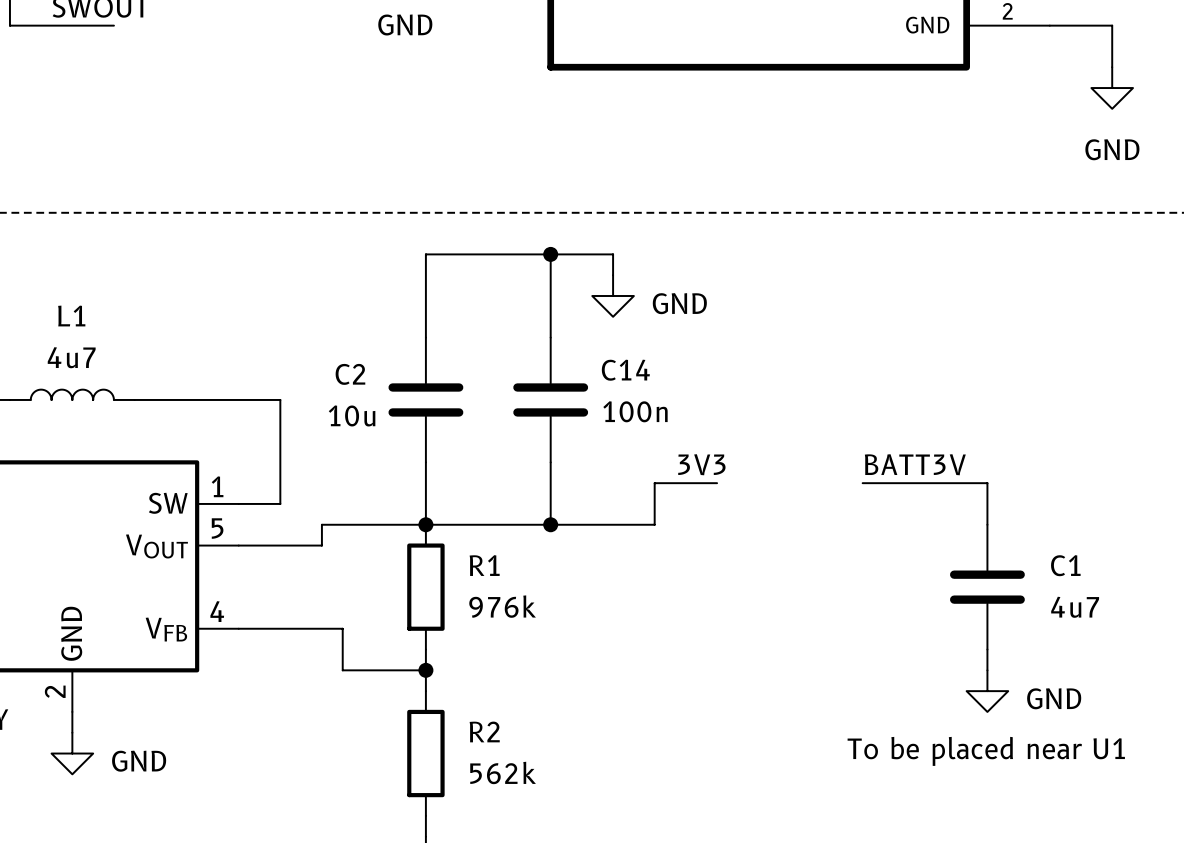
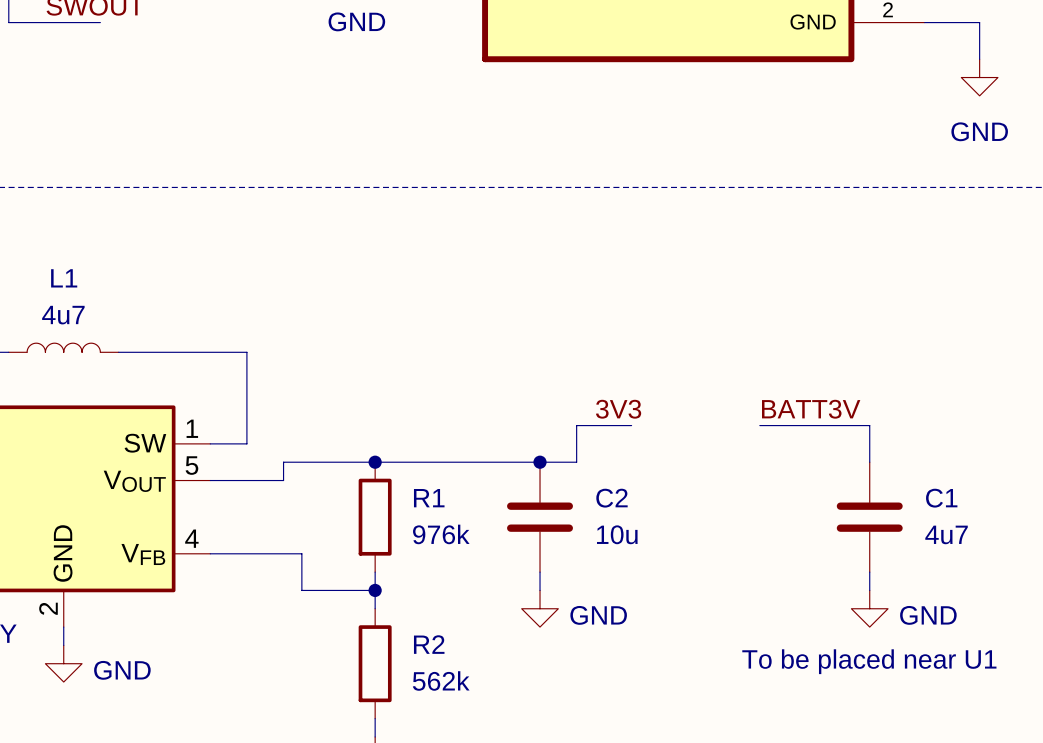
wire: (550, 254) (550, 337) -> none
junction: (550, 254) -> none
wire: (613, 275) (613, 254) (425, 254) (425, 337) -> none
power symbol position: GND (613, 295) -> GND (540, 608)
C2 name position: C2 (350, 374) -> C2 (611, 498)
C2 position: (425, 399) -> (540, 517)
C14: 100n (550, 399) -> none
C2 value position: 10u (352, 415) -> 10u (617, 534)
wire: (425, 462) (425, 524) -> none
wire: (550, 462) (550, 524) -> none
junction position: (550, 524) -> (540, 462)
wire: none -> (540, 572) (540, 590)

